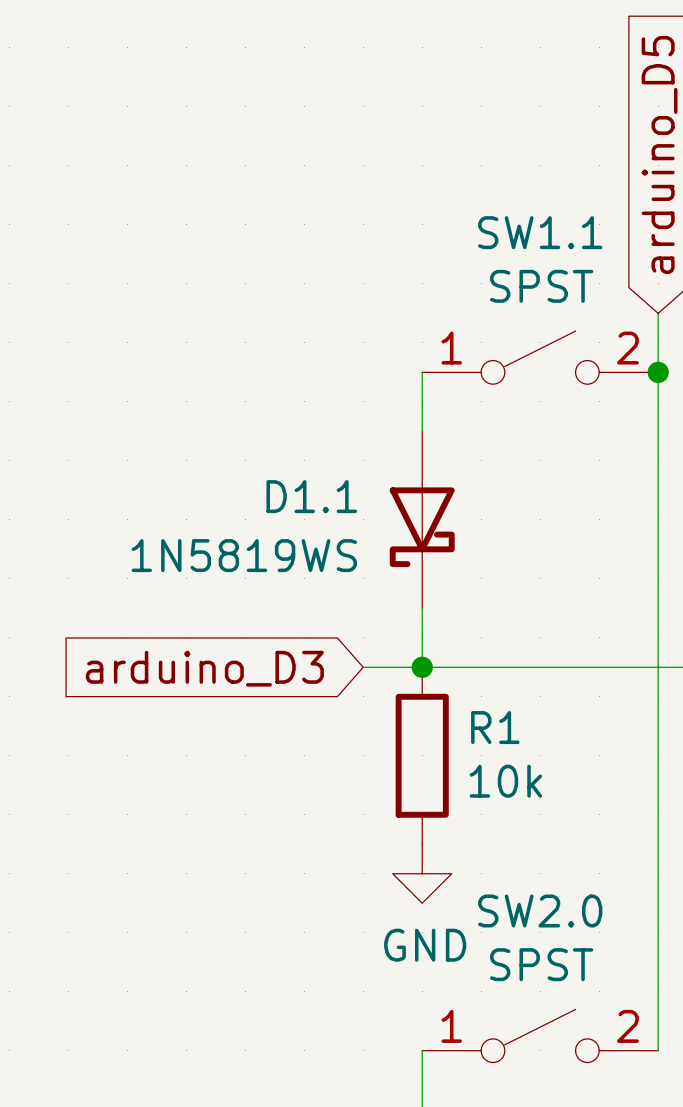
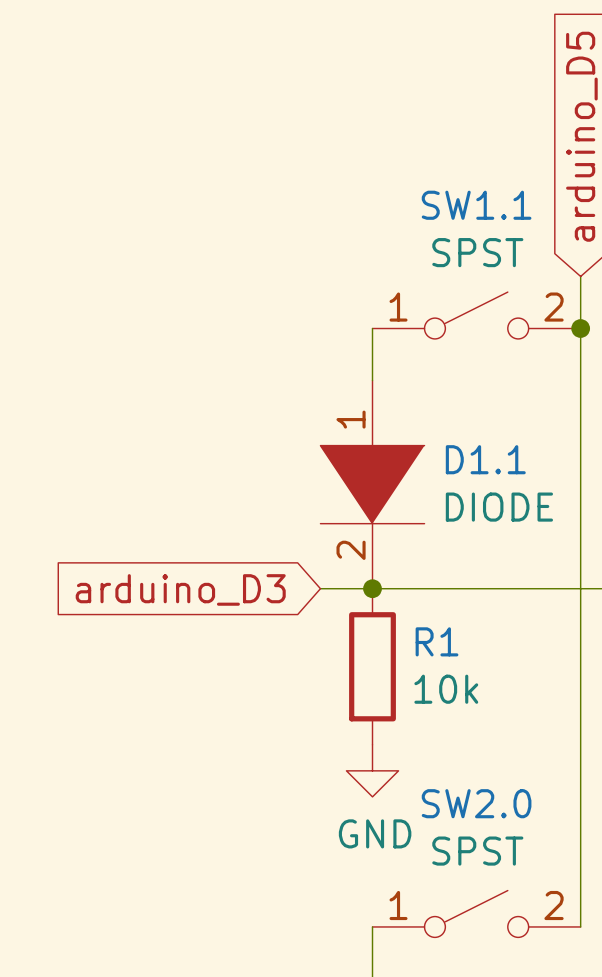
D1.1 symbol: [389, 431, 455, 609] -> [320, 380, 425, 589]
D1.1 name position: D1.1 (311, 496) -> D1.1 (485, 459)
D1.1 value: 1N5819WS (244, 555) -> DIODE (499, 507)

